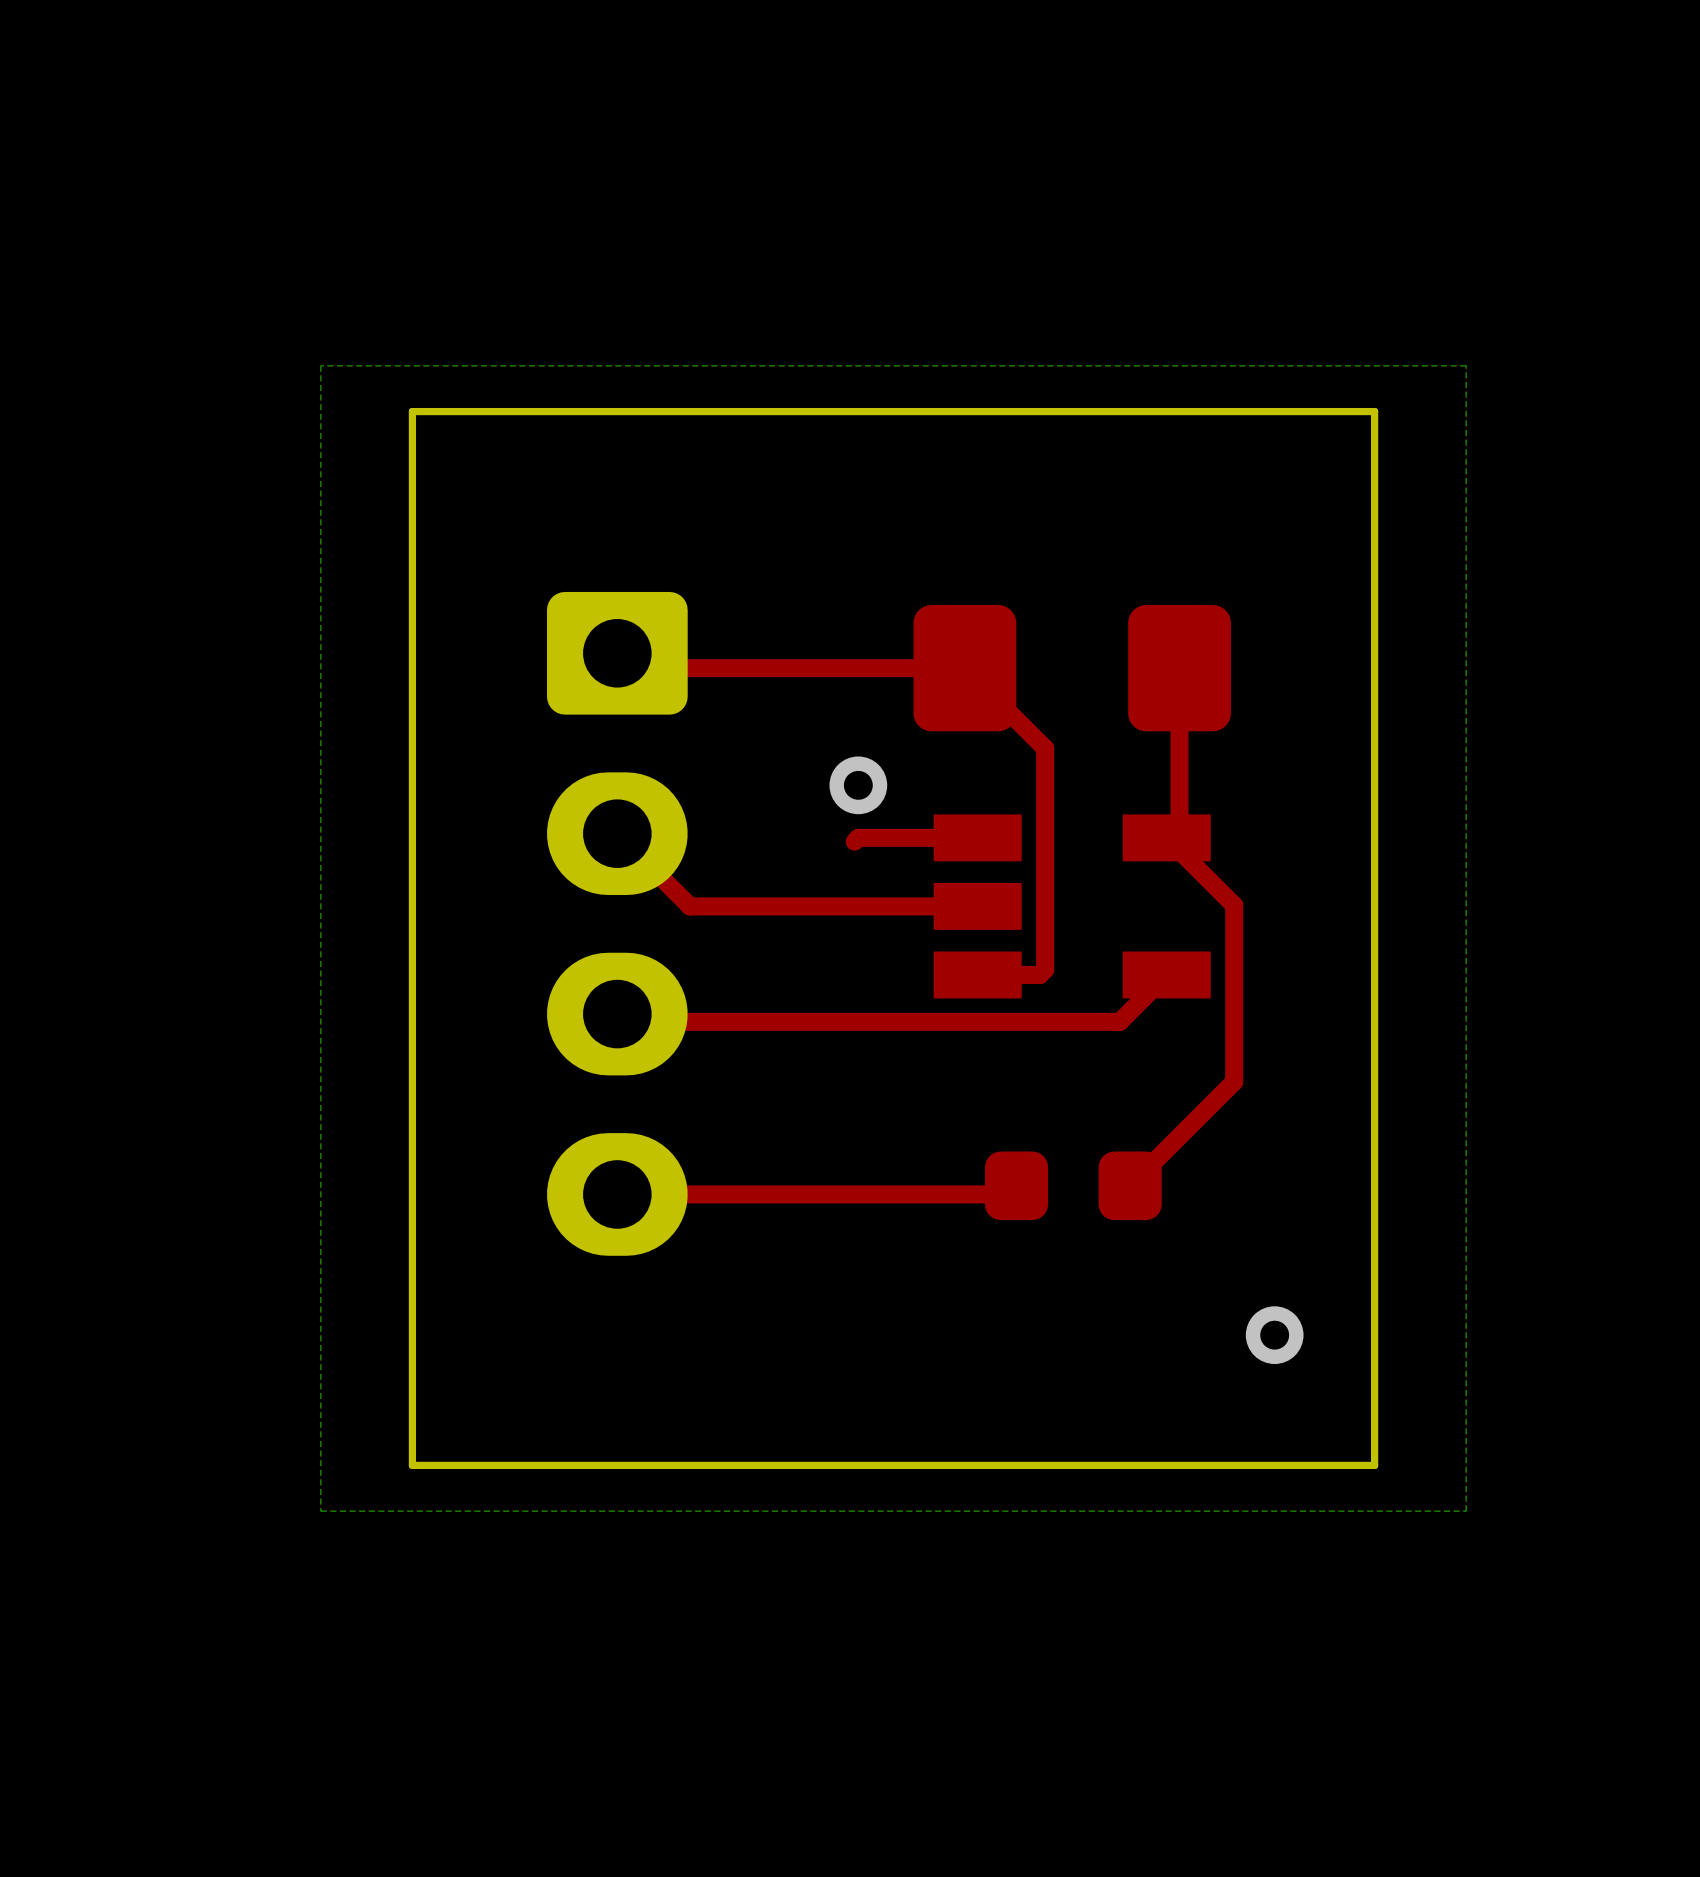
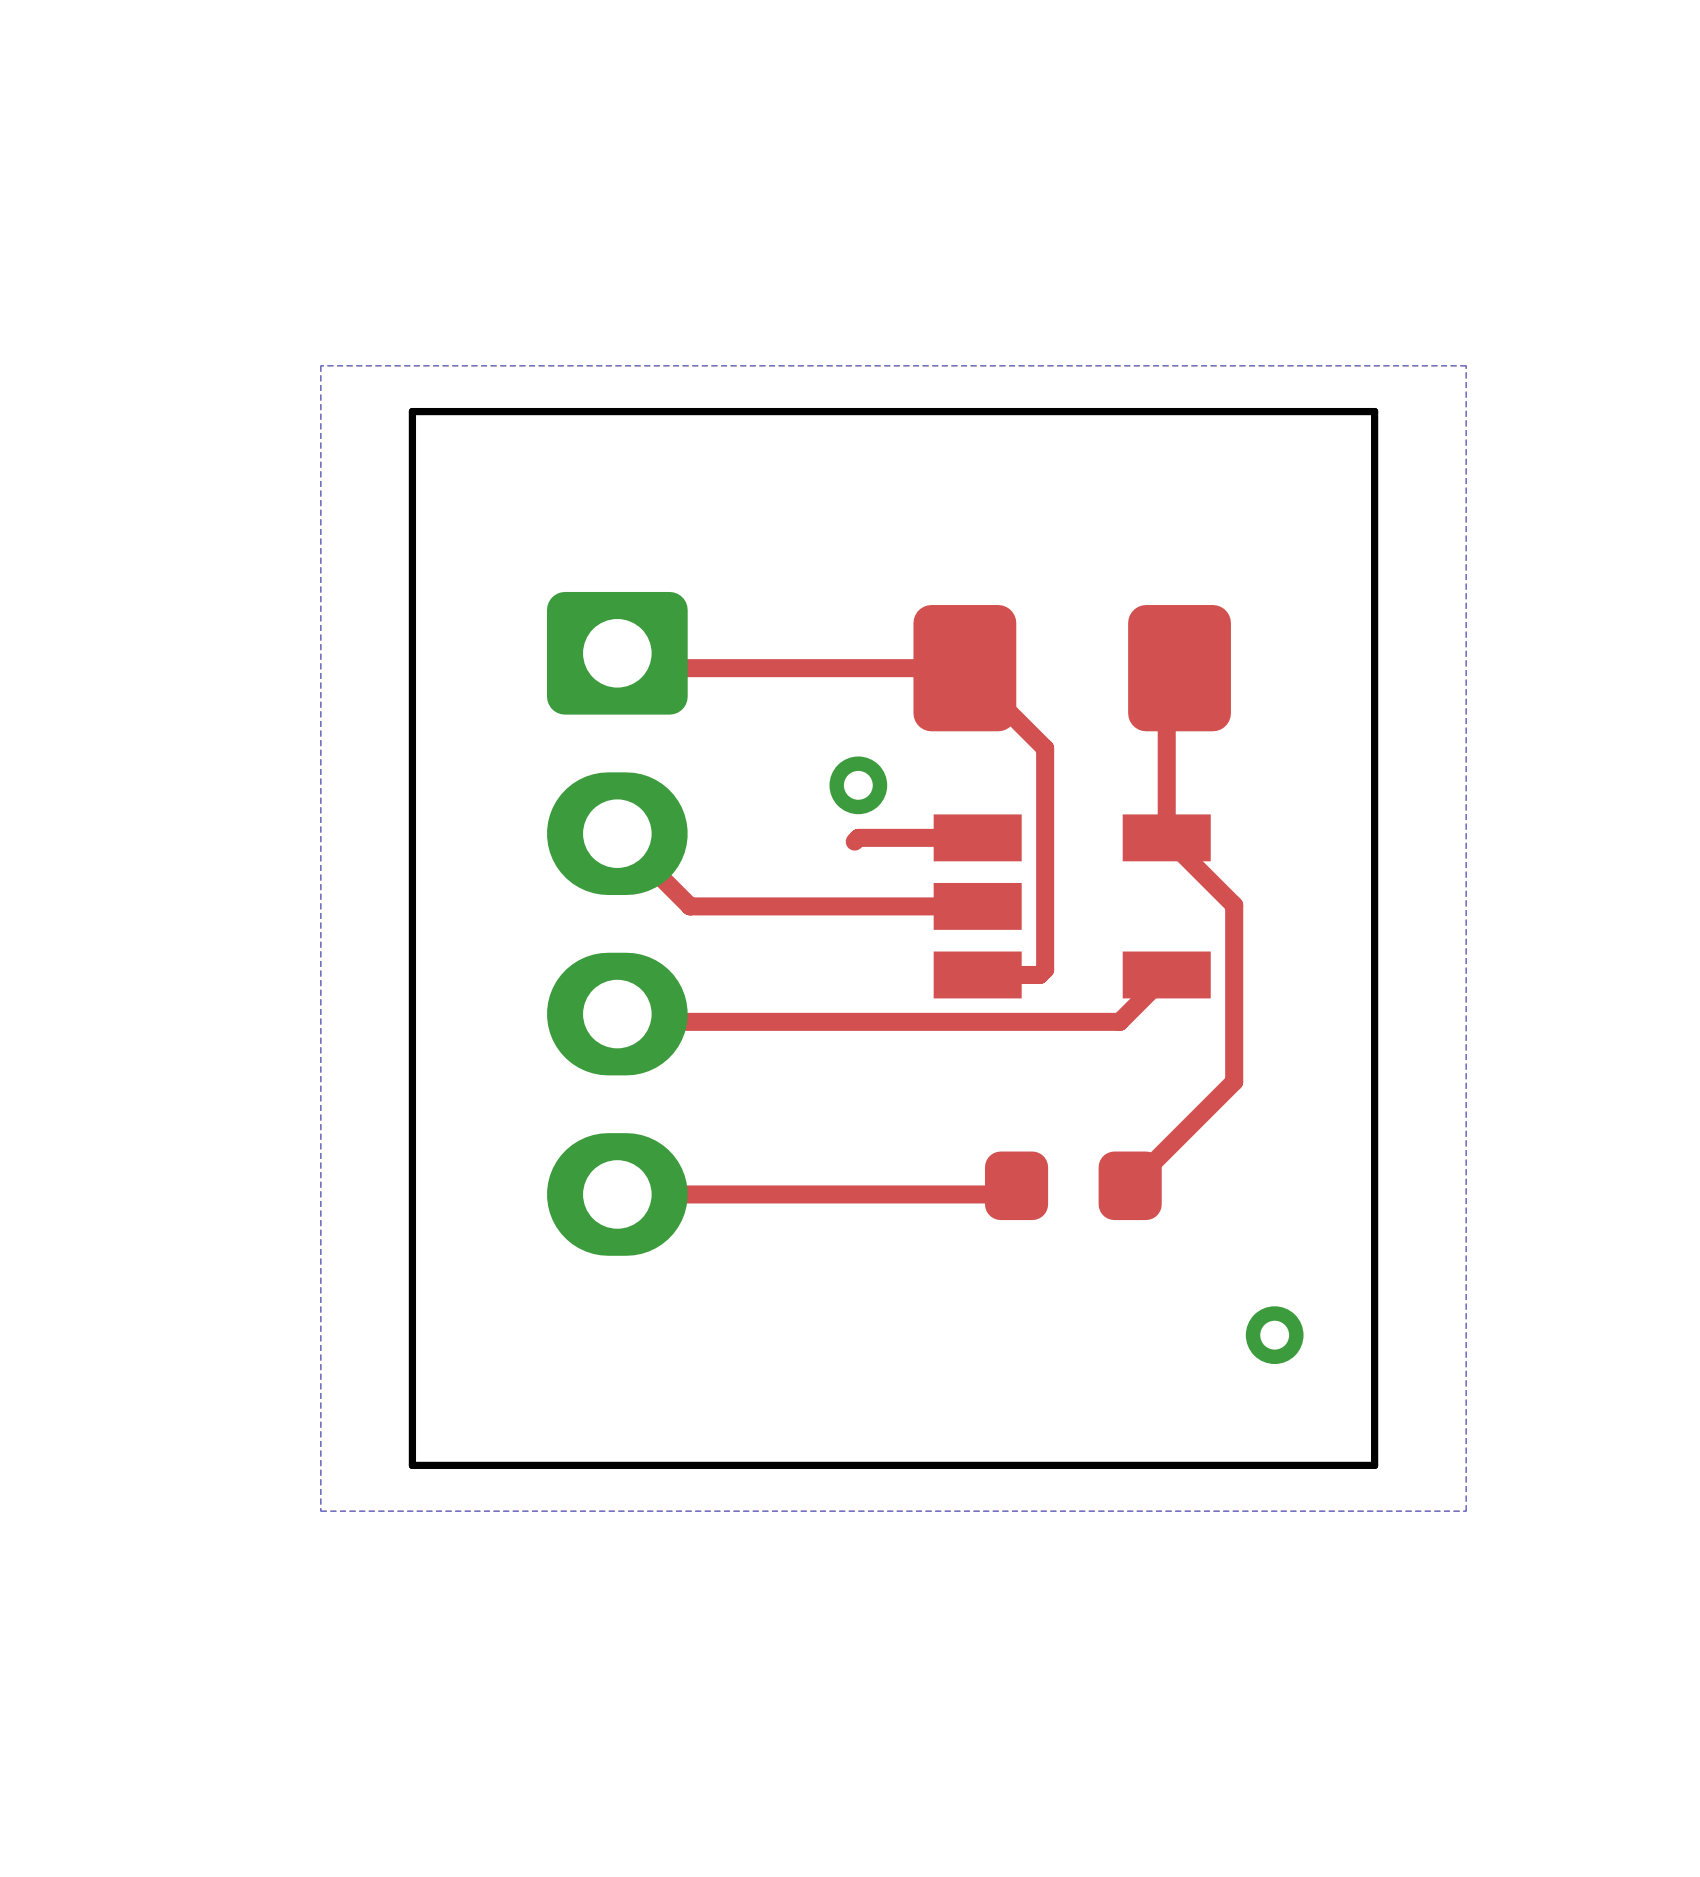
top track: (1179, 668) (1179, 825) -> (1179, 668) (1166, 680) (1166, 837)

